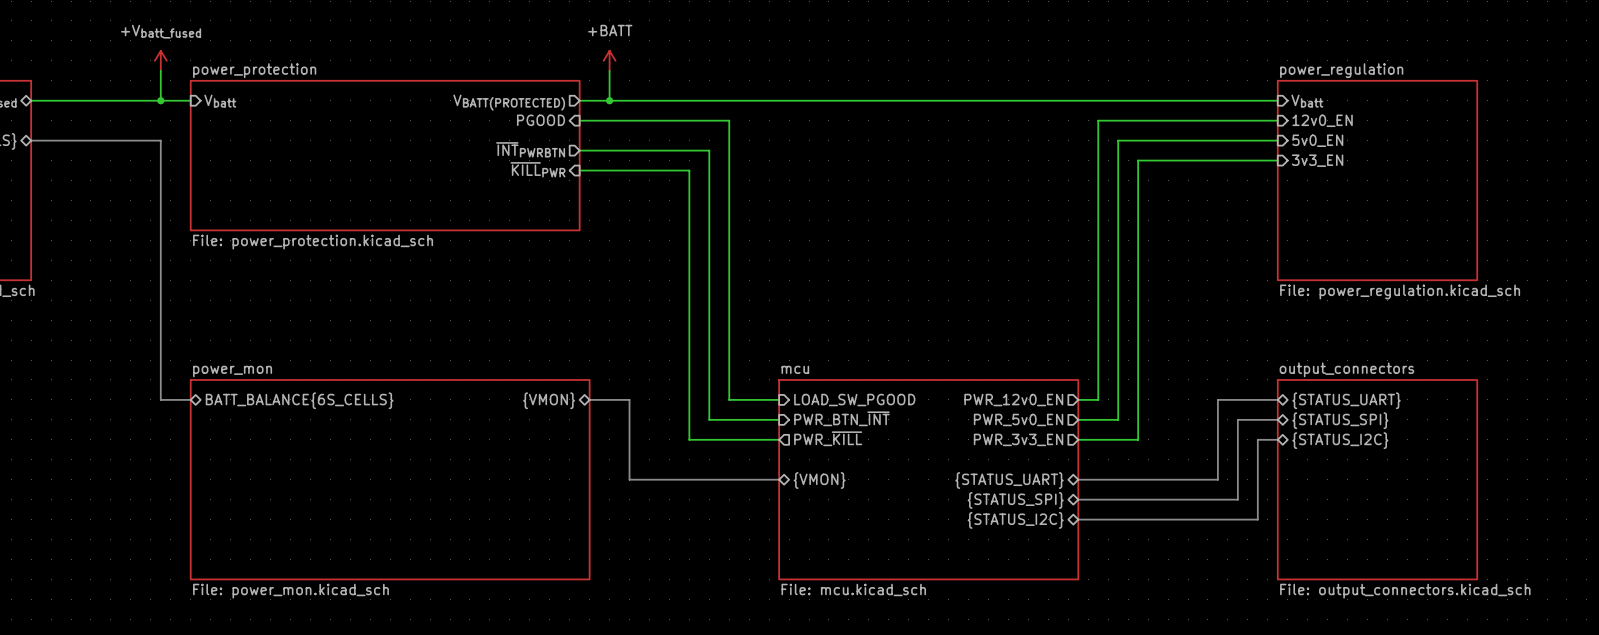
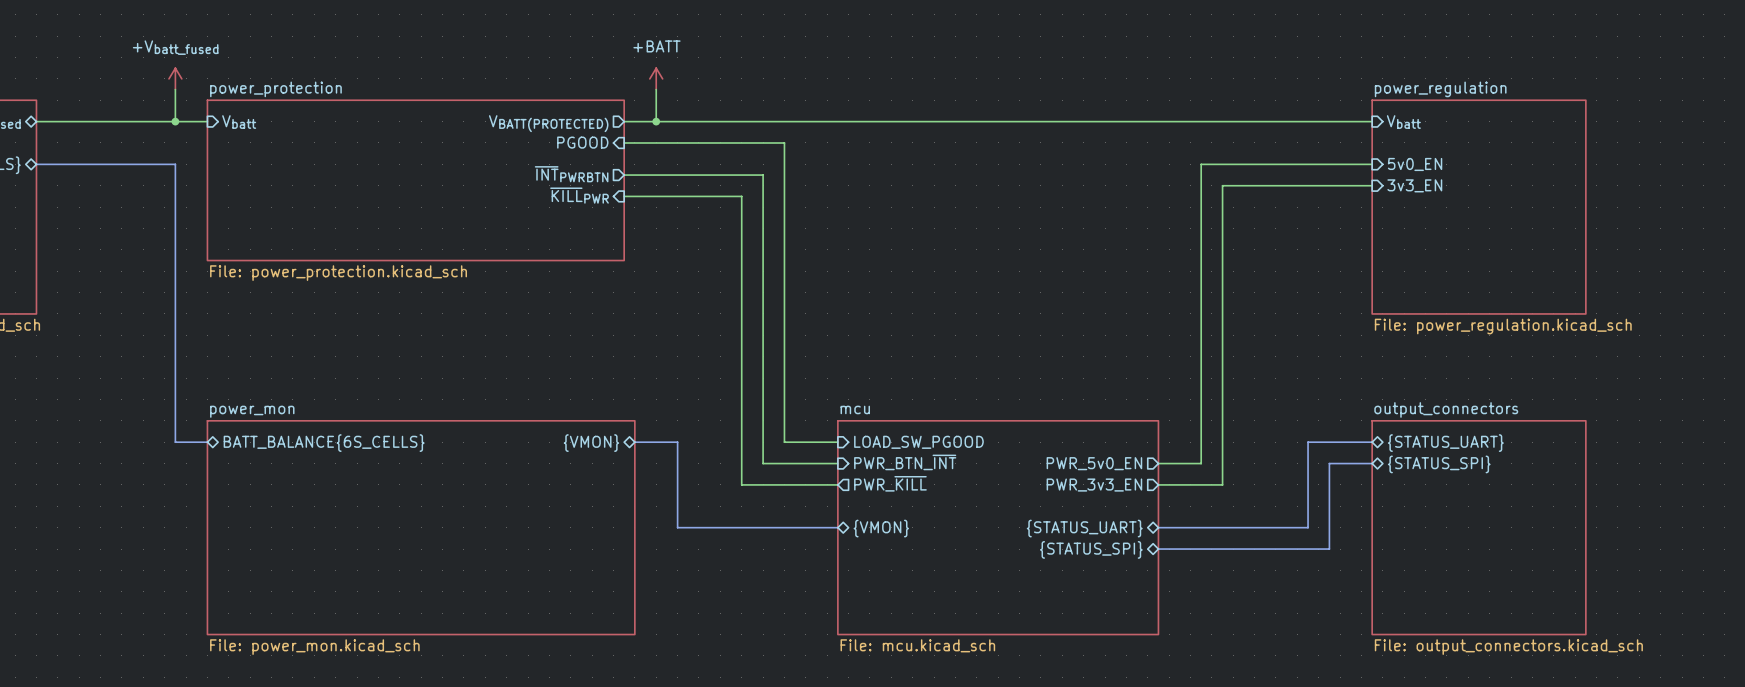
wire: (1277, 120) (1098, 120) (1098, 399) (1078, 399) -> none
sheet pin: 12v0_EN (1322, 120) -> none
sheet pin: PWR_12v0_EN (1013, 400) -> none
bus: (1277, 439) (1257, 439) (1257, 519) (1078, 519) -> none
sheet pin: {STATUS_I2C} (1340, 440) -> none
sheet pin: {STATUS_I2C} (1015, 520) -> none

